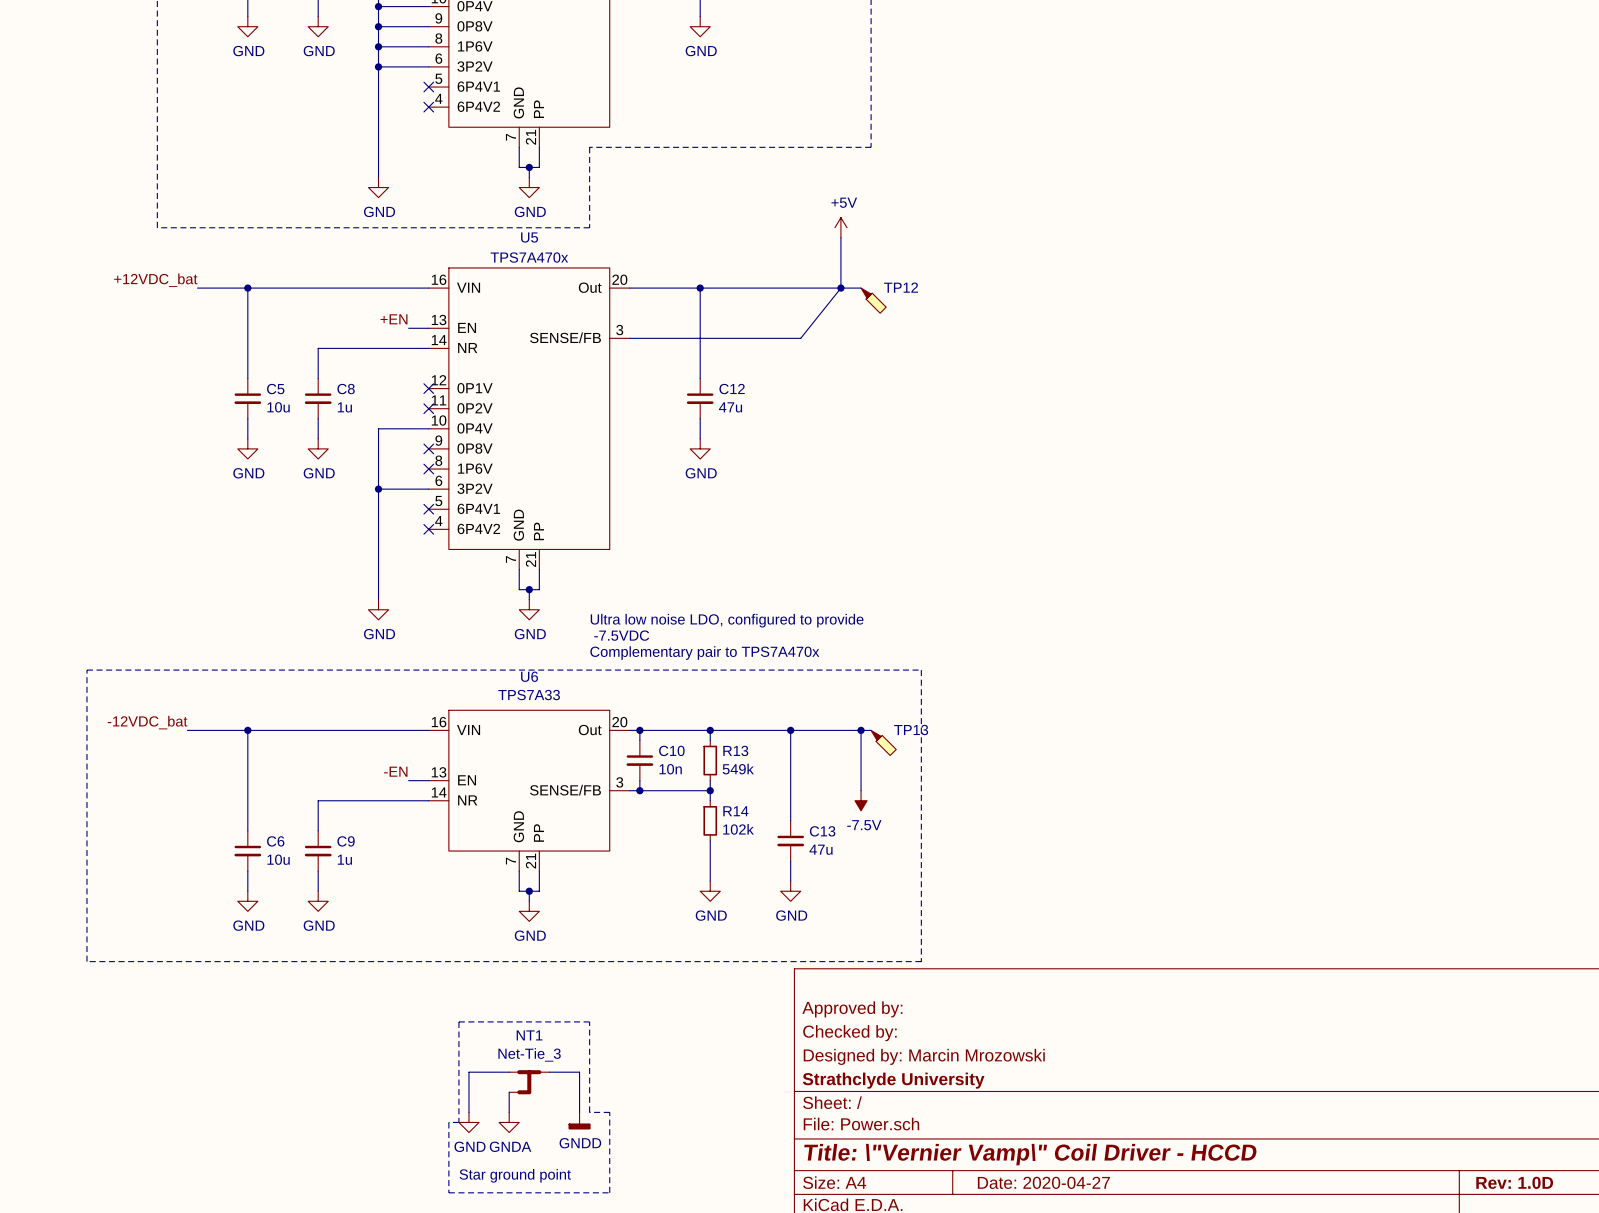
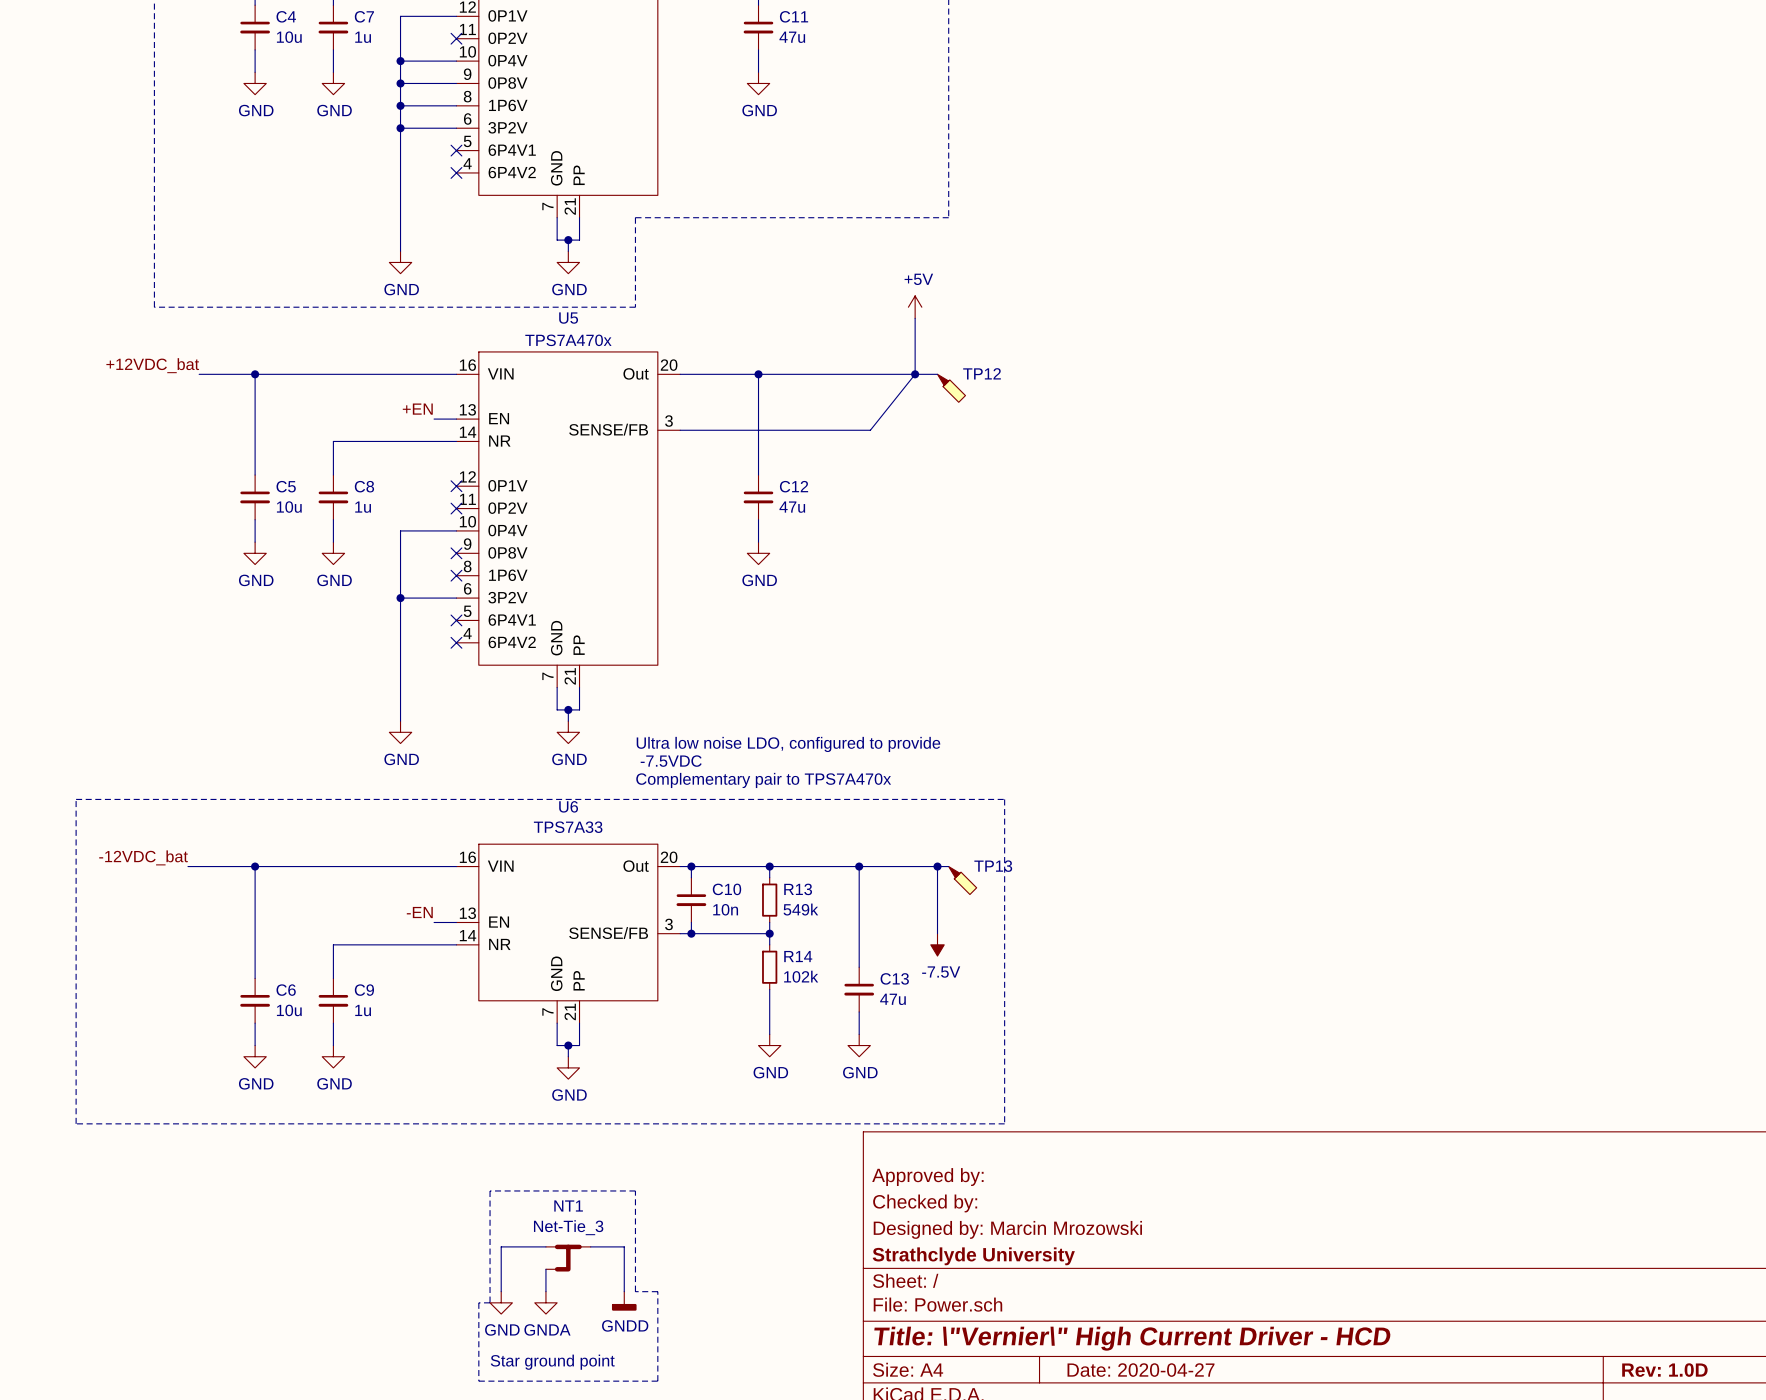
title block: Title: \"Vernier Vamp\" Coil Driver - HCCD (1030, 1154) -> Title: \"Vernier\" High Current Driver - HCD (1132, 1338)

